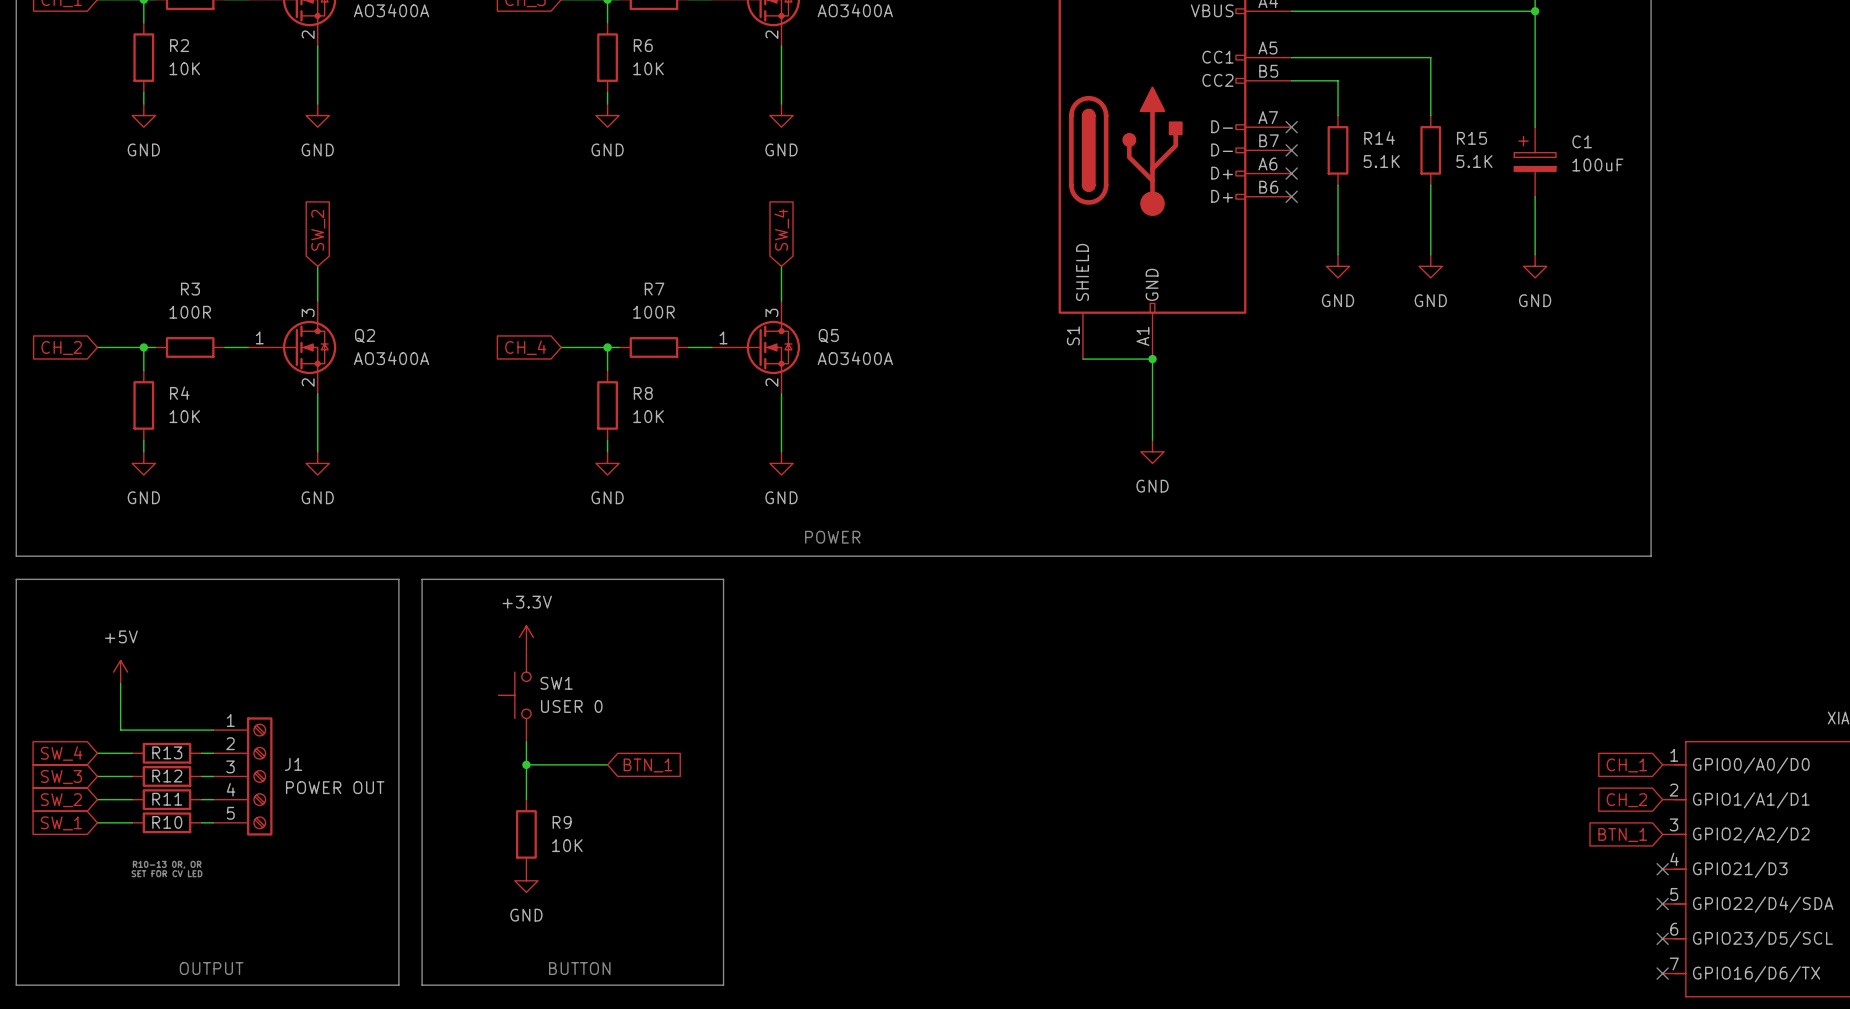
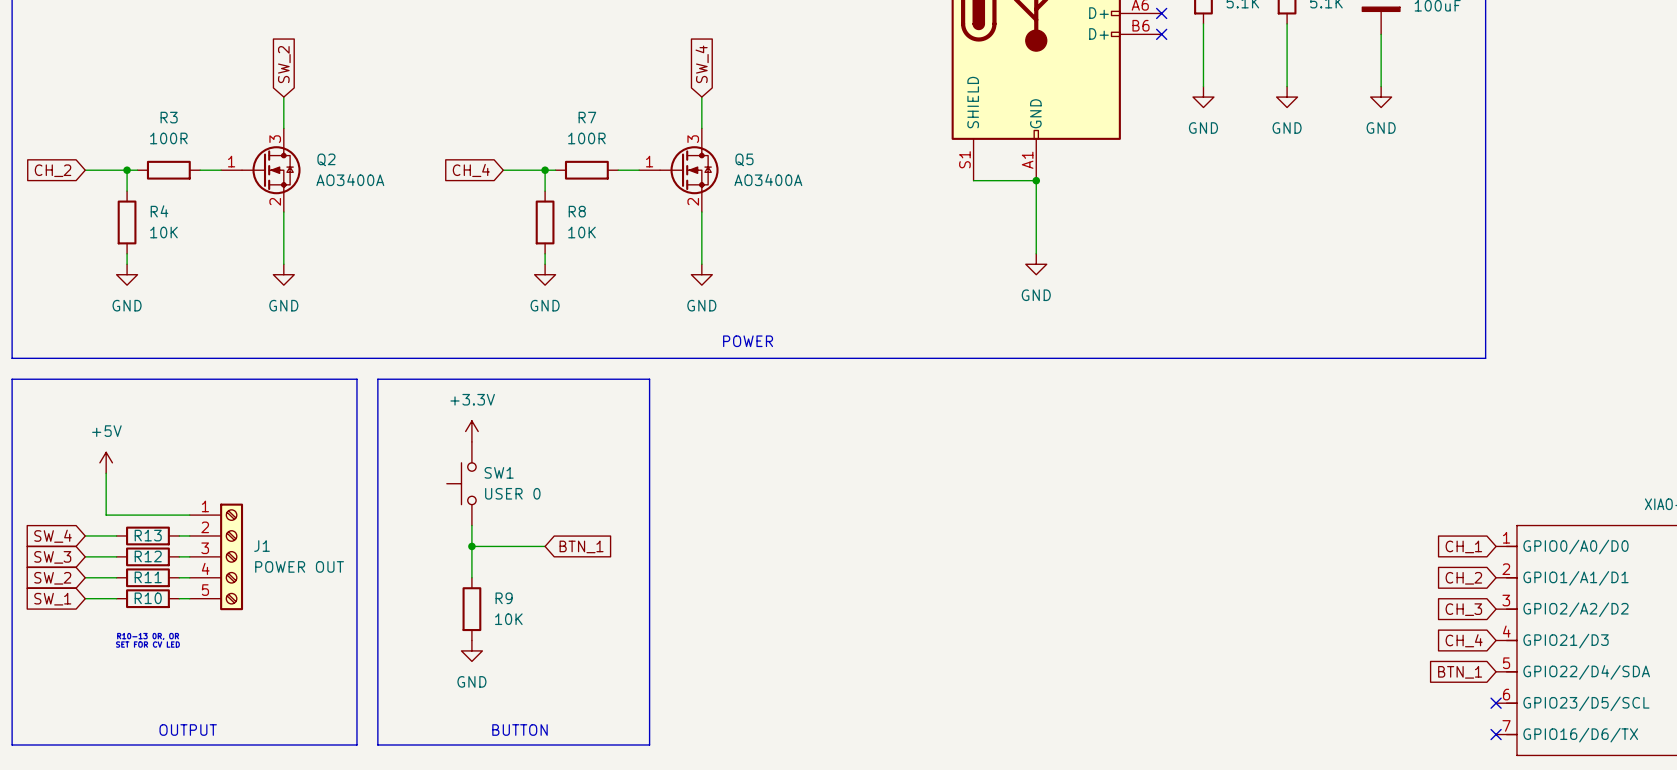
global label: BTN_1 (1622, 834) -> CH_3 (1463, 609)
global label: none -> CH_4 (1464, 640)
no-connect mark: (1662, 869) -> none
global label: none -> BTN_1 (1460, 672)
no-connect mark: (1662, 904) -> none

